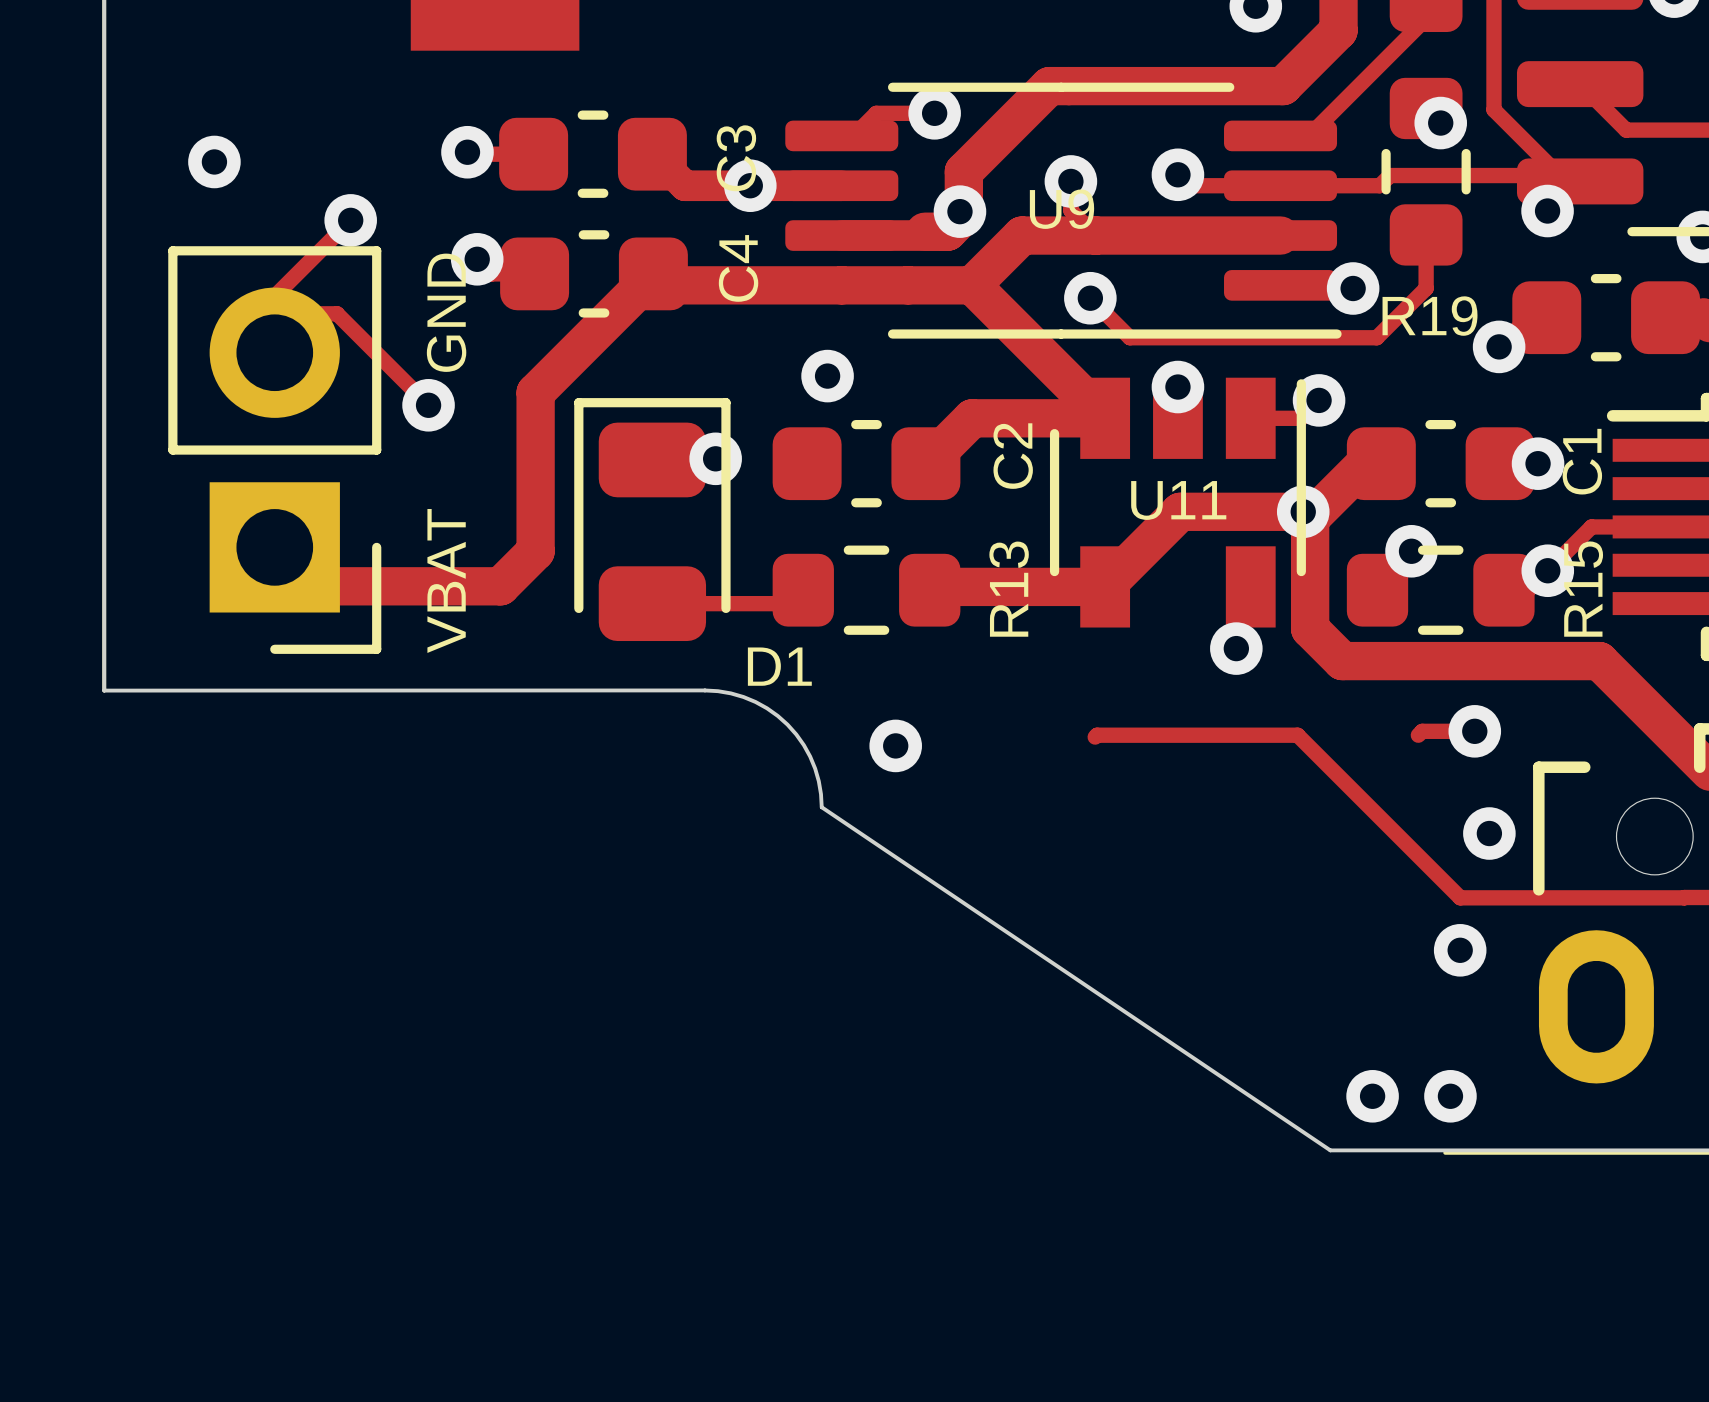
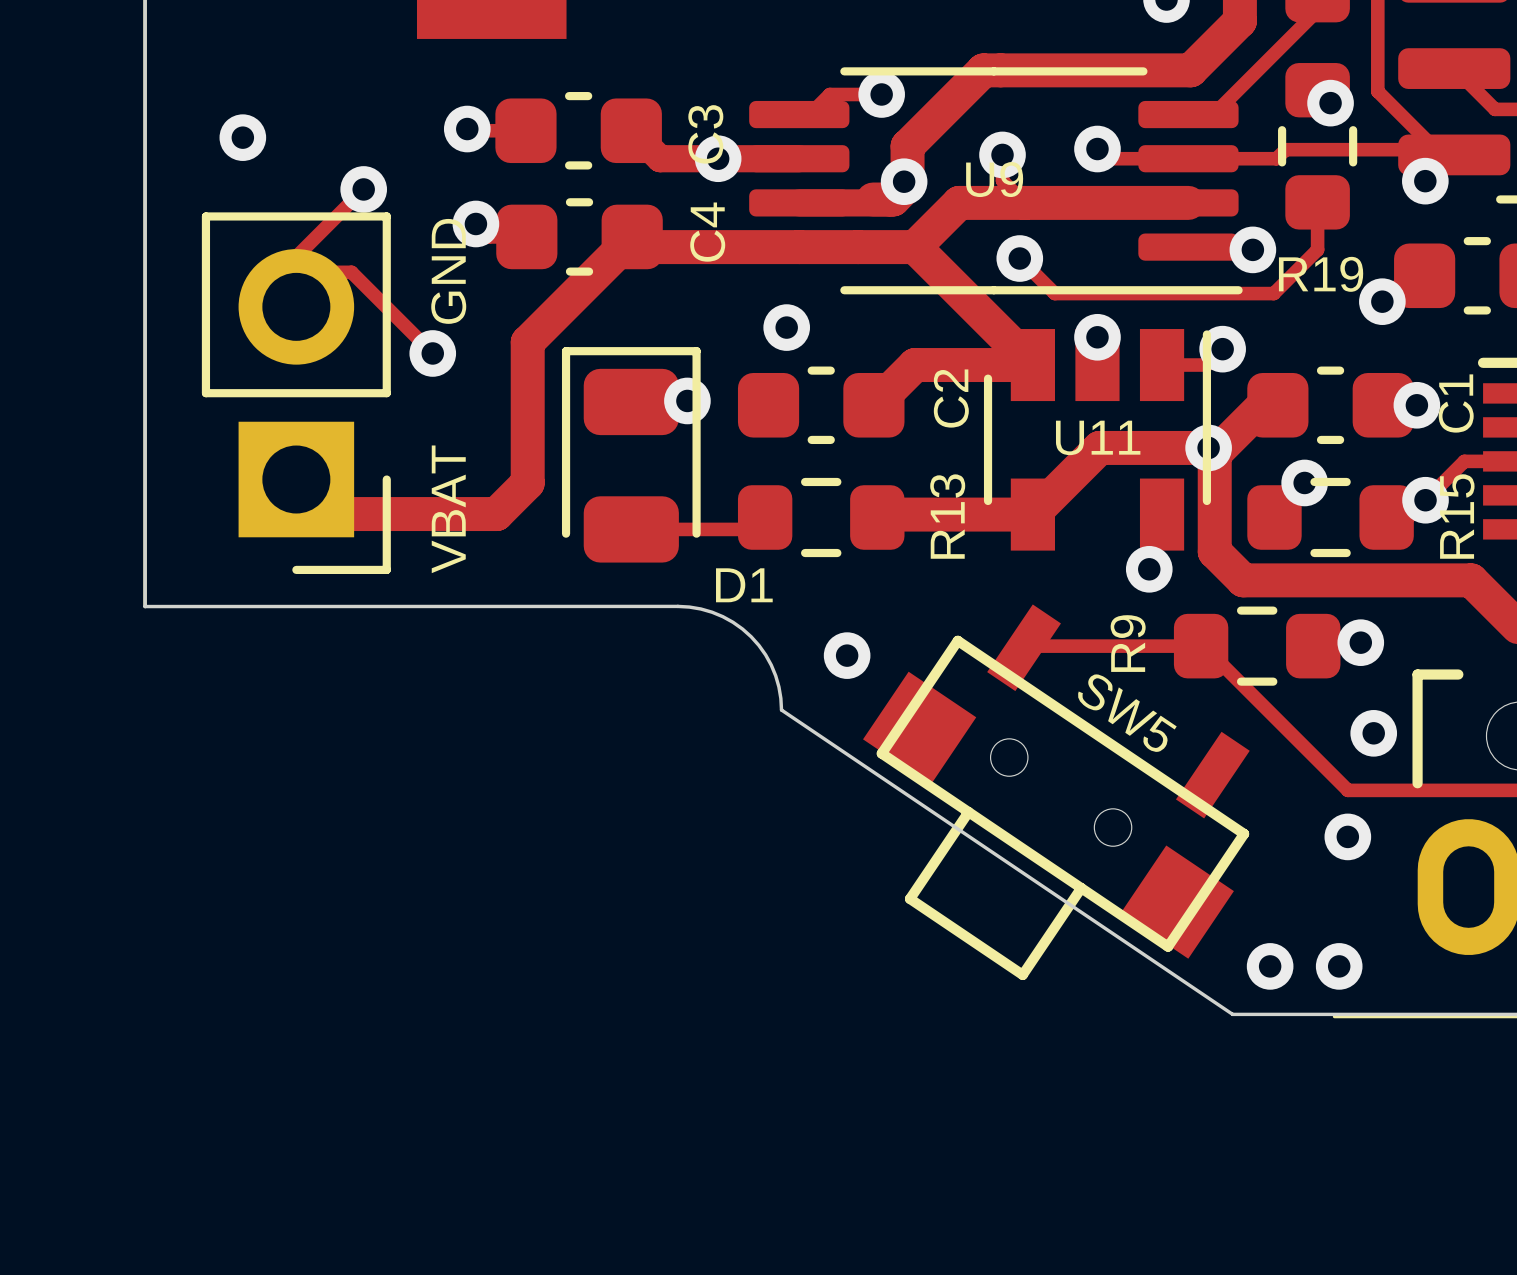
R9: none -> (1257, 646)
SW5: none -> (1056, 792)

